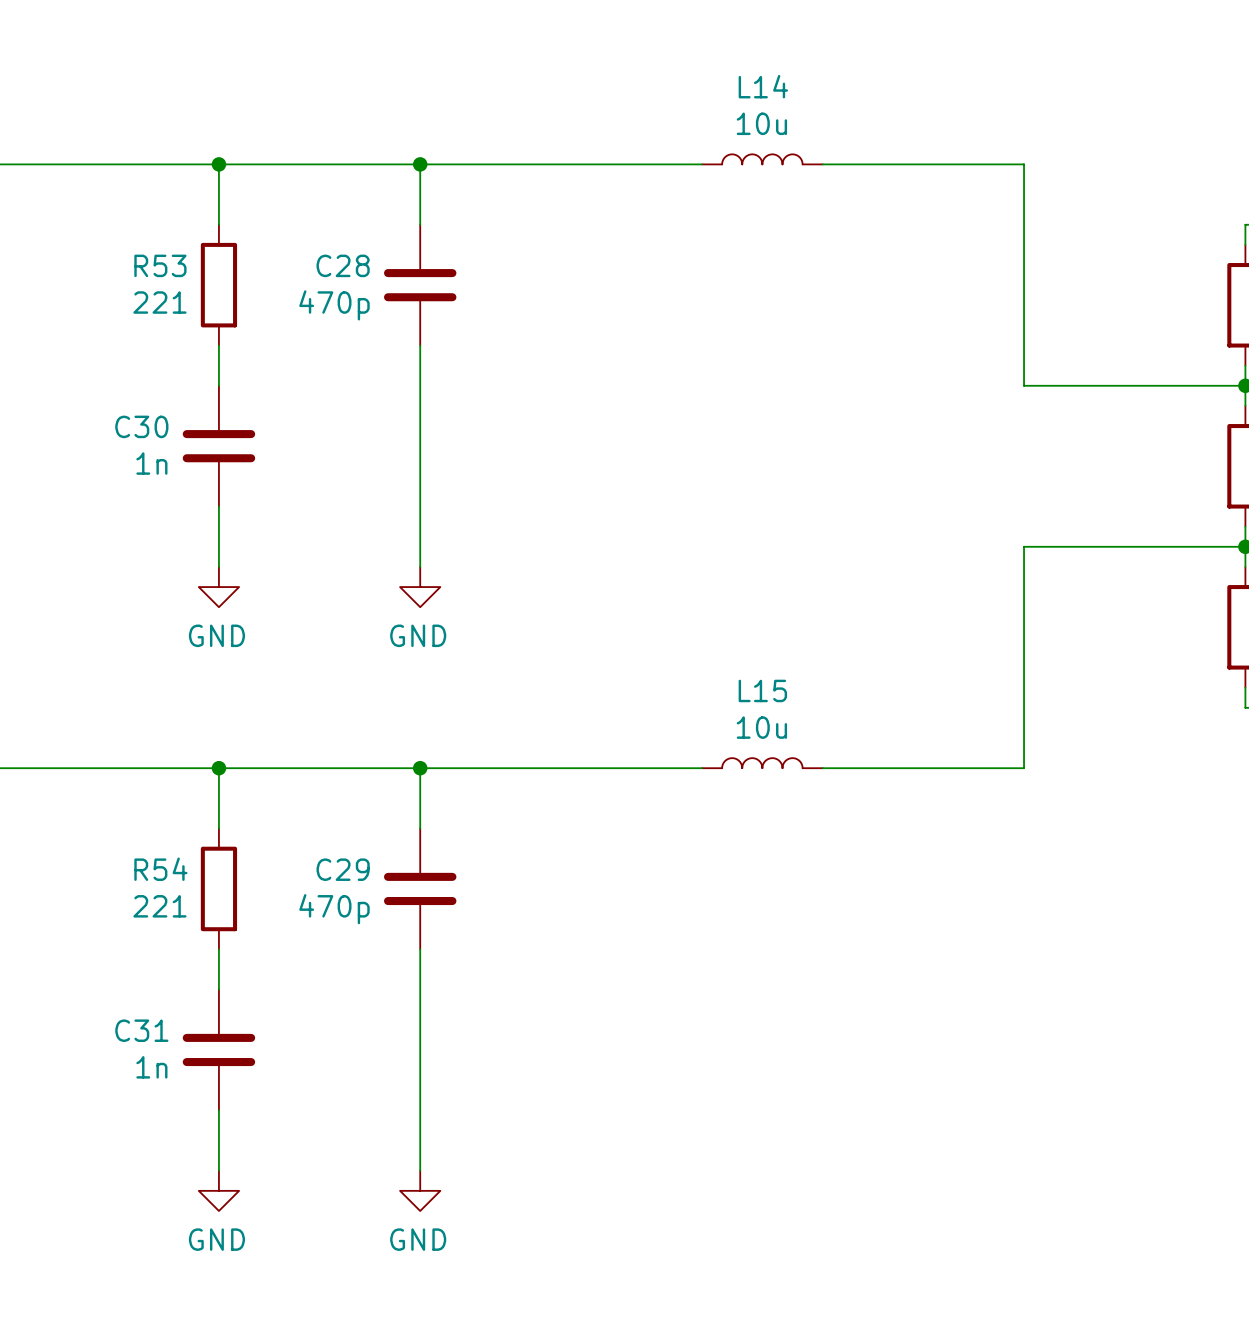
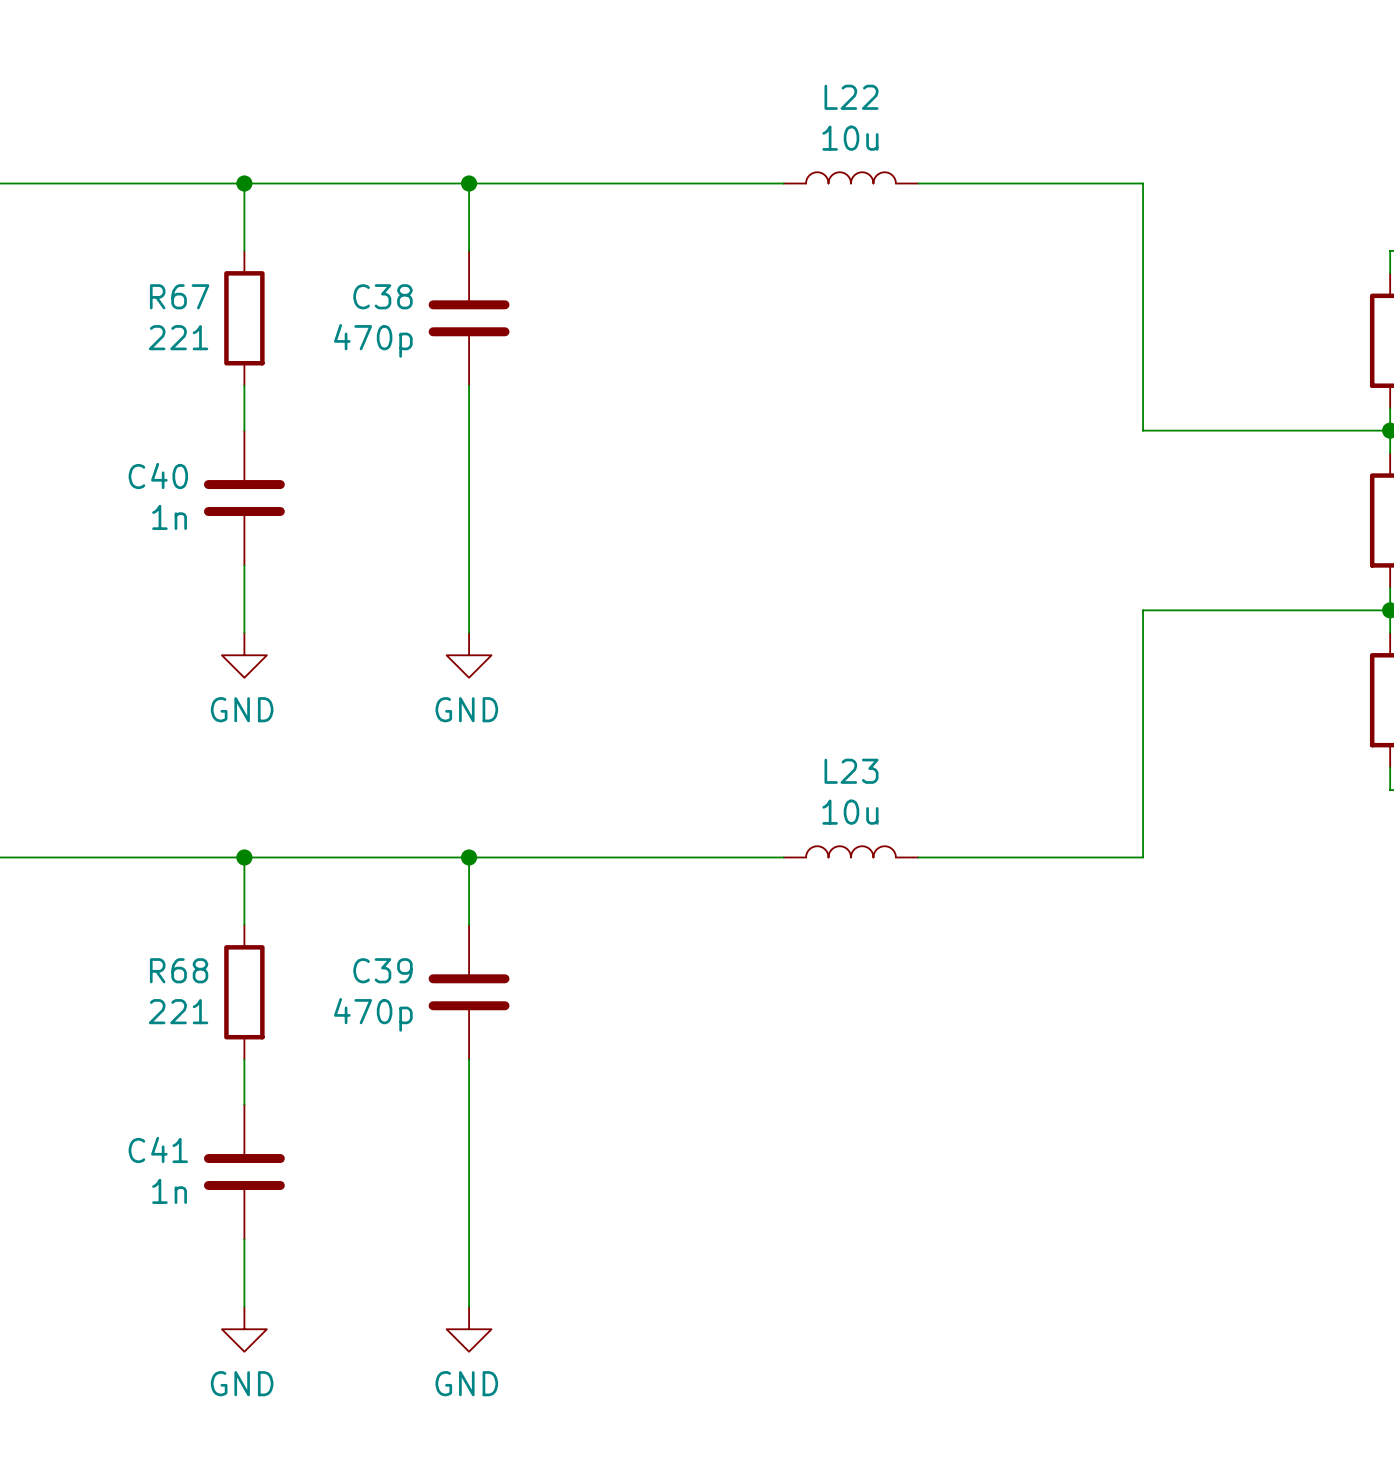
L14 name: L14 (763, 86) -> L22 (851, 97)
R53 name: R53 (160, 265) -> R67 (179, 296)
C28 name: C28 (343, 265) -> C38 (382, 296)
C30 name: C30 (141, 426) -> C40 (158, 475)
L15 name: L15 (762, 690) -> L23 (851, 771)
R54 name: R54 (160, 869) -> R68 (179, 970)
C29 name: C29 (343, 869) -> C39 (382, 970)
C31 name: C31 (141, 1030) -> C41 (158, 1149)

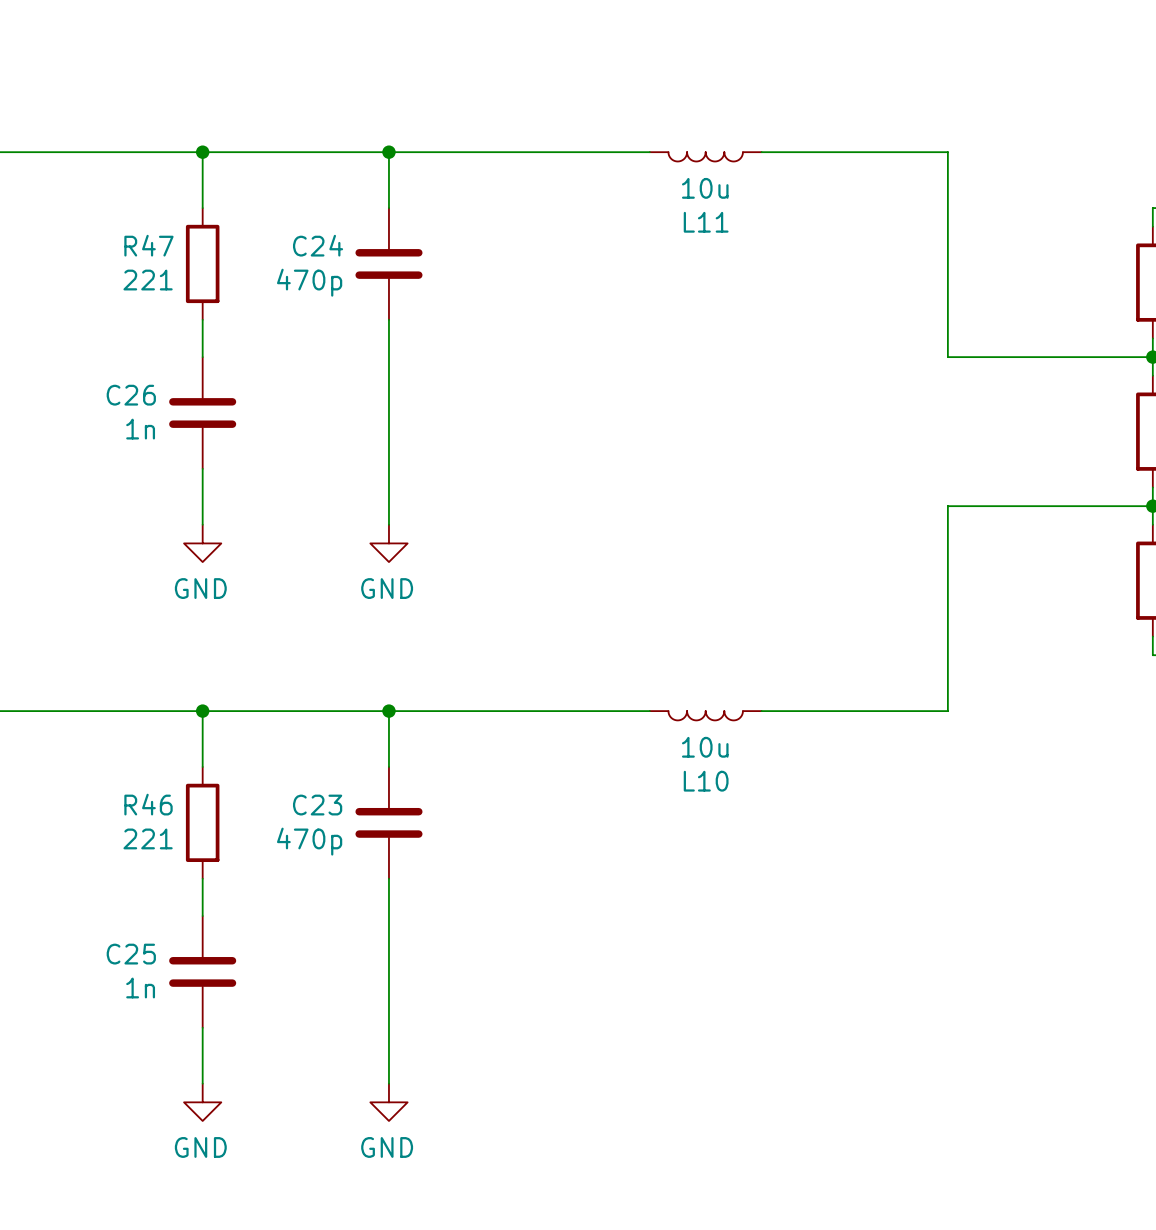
L22: 10u (850, 177) -> none
L11: none -> 10u (705, 156)
R67 name: R67 (179, 296) -> R47 (148, 245)
C38 name: C38 (382, 296) -> C24 (318, 245)
C40 name: C40 (158, 475) -> C26 (131, 395)
L23: 10u (850, 851) -> none
L10: none -> 10u (705, 715)
R68 name: R68 (179, 970) -> R46 (148, 804)
C39 name: C39 (382, 970) -> C23 (317, 805)
C41 name: C41 (158, 1149) -> C25 (131, 954)

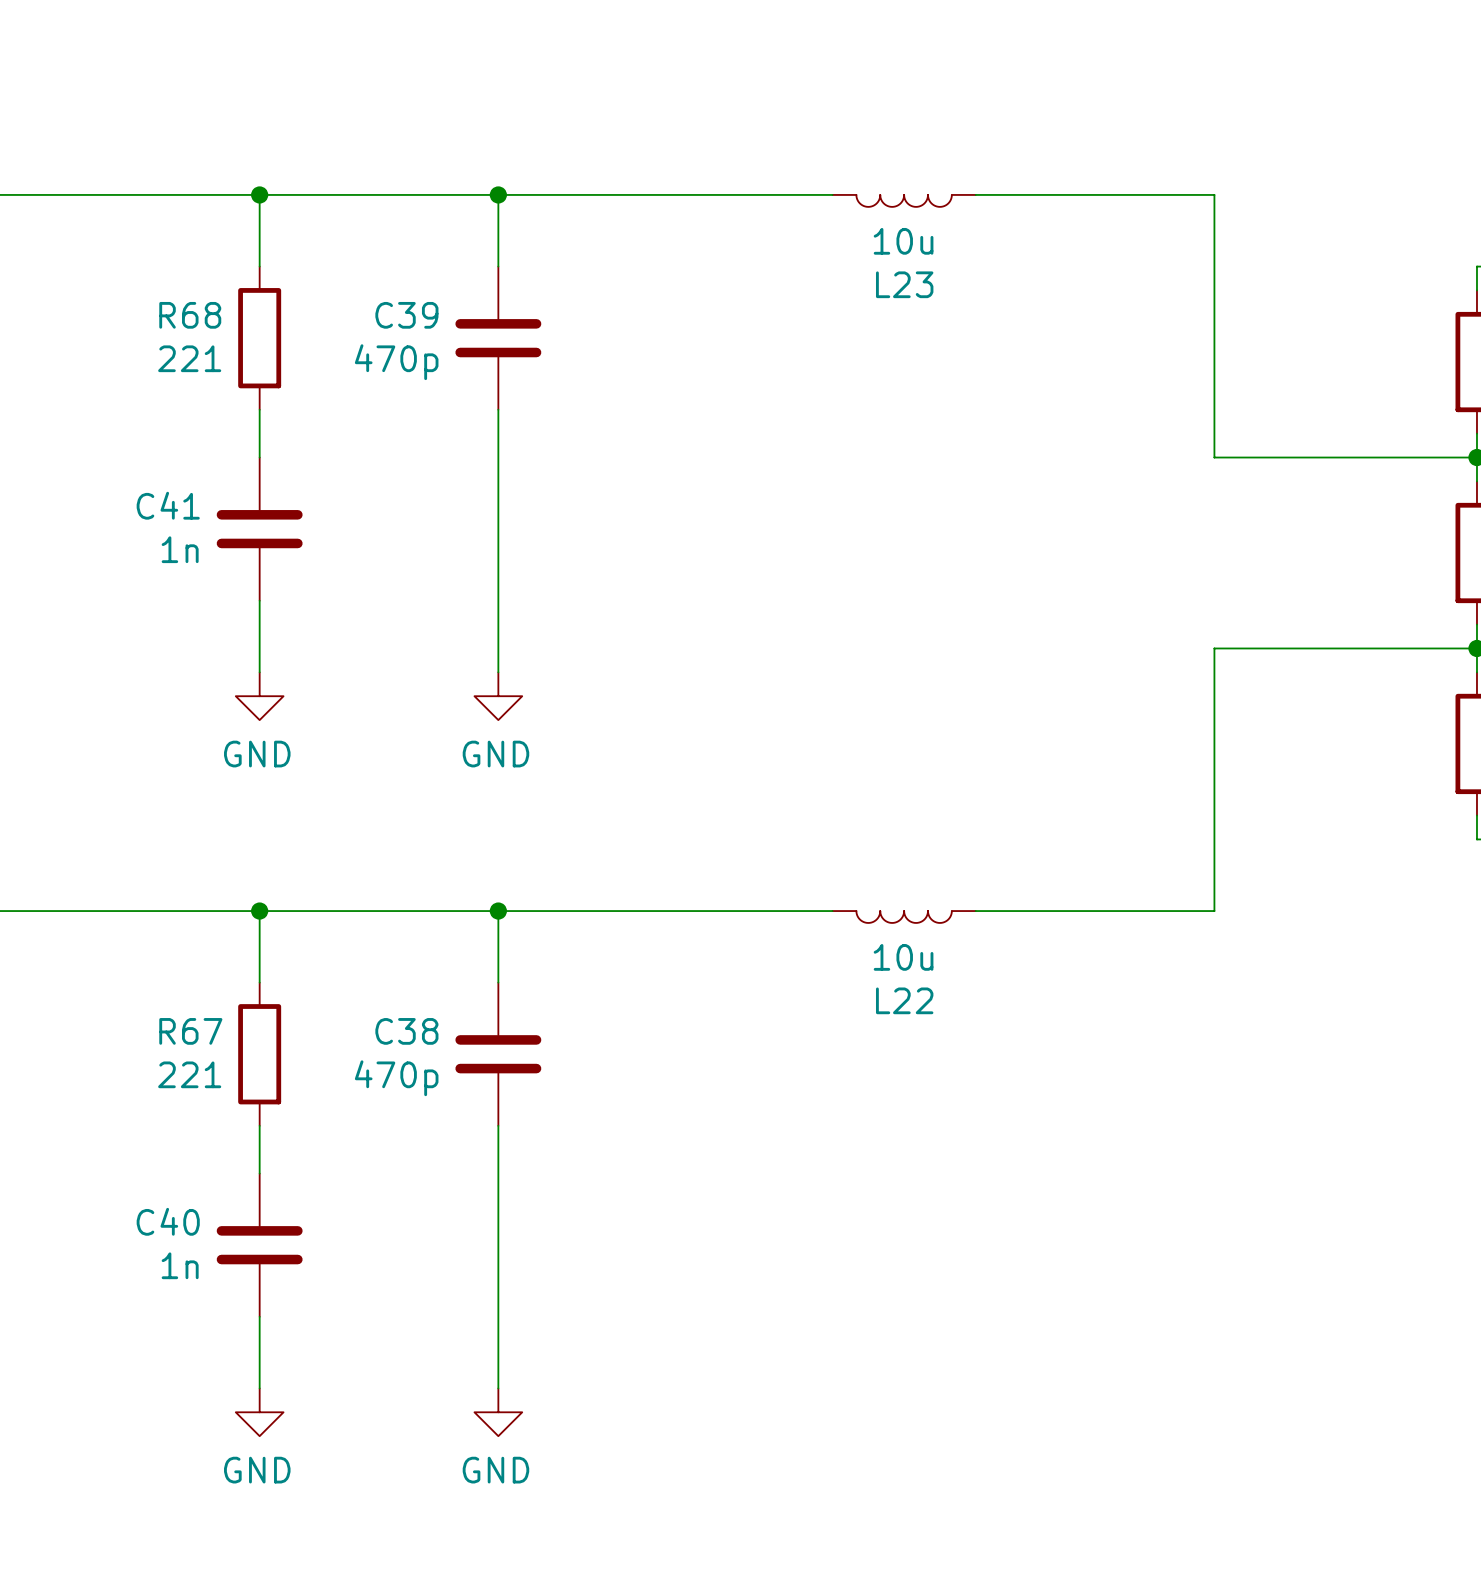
L11 name: L11 (706, 222) -> L23 (904, 284)
R47 name: R47 (148, 245) -> R68 (190, 315)
C24 name: C24 (318, 245) -> C39 (406, 315)
C26 name: C26 (131, 395) -> C41 (168, 505)
L10 name: L10 (706, 781) -> L22 (904, 1000)
R46 name: R46 (148, 804) -> R67 (190, 1031)
C23 name: C23 (317, 805) -> C38 (406, 1031)
C25 name: C25 (131, 954) -> C40 (168, 1221)

